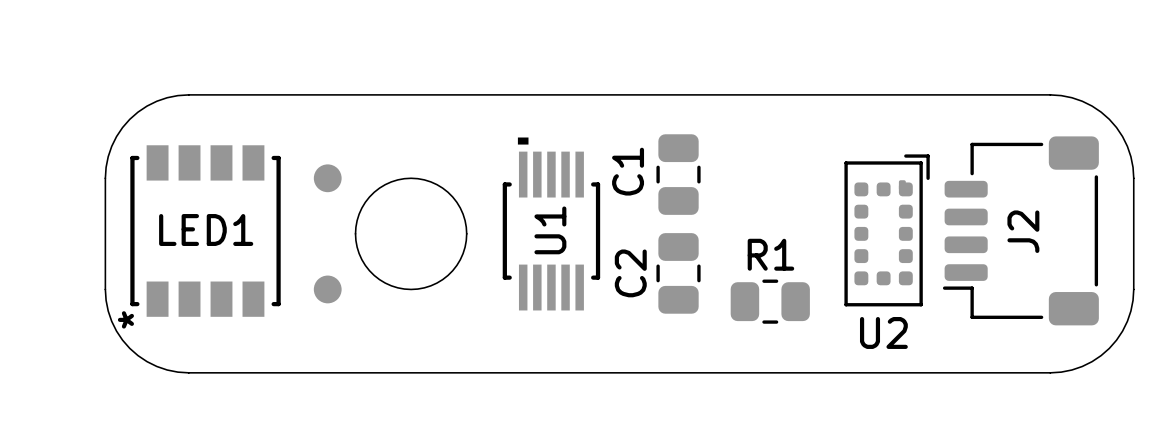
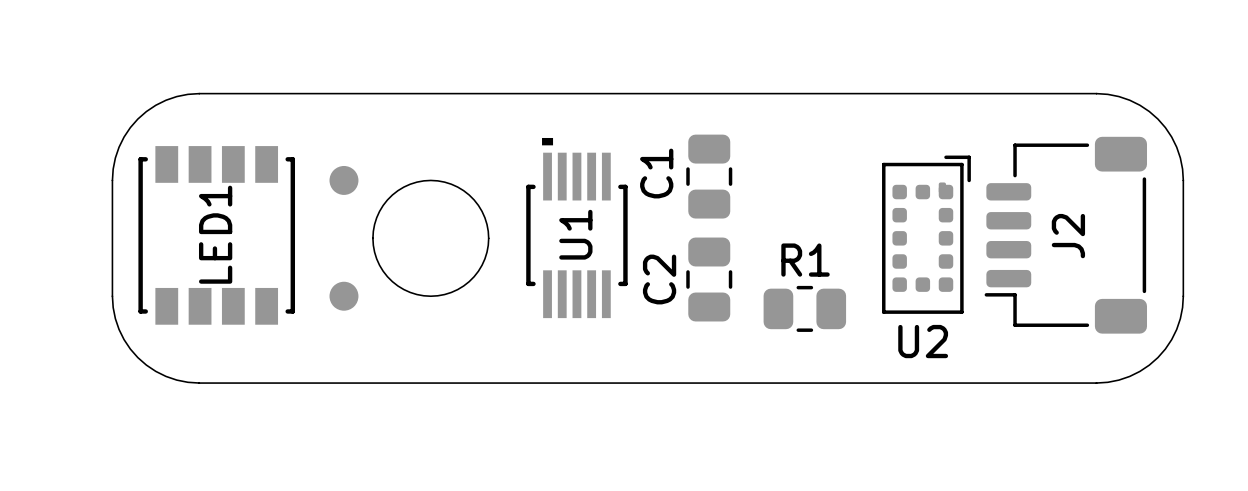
LED1 name rotation: 0° (206, 230) -> 90° counterclockwise (215, 234)
LED1 text: * (125, 319) -> none

